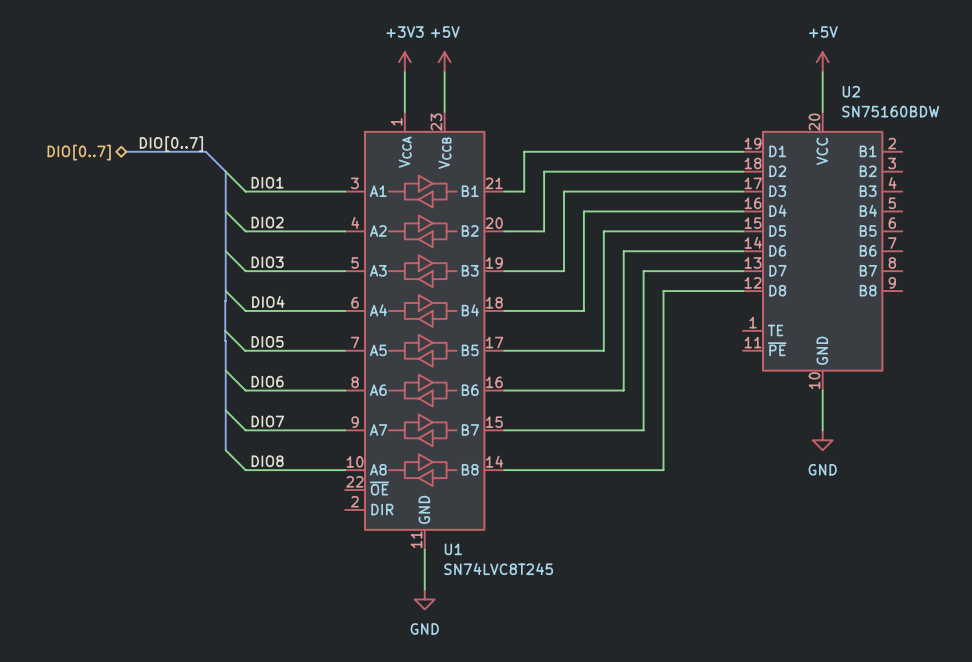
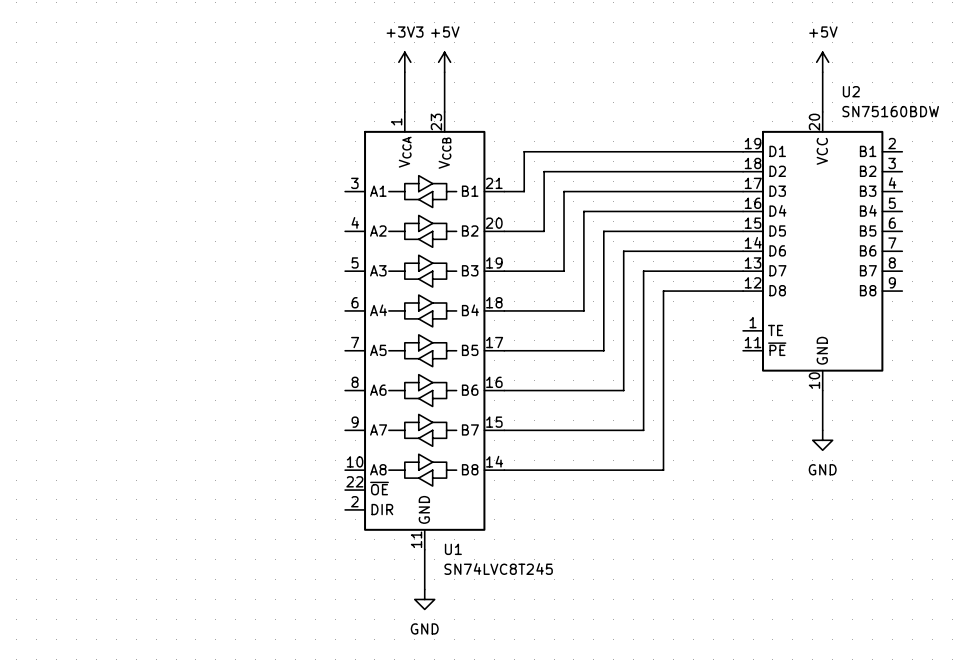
label: DIO[0..7] (171, 144) -> none
bus: (126, 151) (205, 151) (225, 171) (225, 450) -> none
hierarchical label: DIO[0..7] (79, 152) -> none
wire: (225, 171) (245, 191) (345, 191) -> none
label: DIO1 (267, 182) -> none
wire: (225, 211) (245, 231) (345, 231) -> none
label: DIO2 (267, 222) -> none
wire: (225, 251) (245, 271) (345, 271) -> none
label: DIO3 (267, 262) -> none
wire: (225, 291) (245, 310) (345, 310) -> none
label: DIO4 (268, 301) -> none
wire: (225, 330) (245, 350) (344, 350) -> none
label: DIO5 (267, 341) -> none
wire: (225, 370) (245, 390) (345, 390) -> none
label: DIO6 (267, 381) -> none
wire: (225, 410) (245, 430) (345, 430) -> none
label: DIO7 (267, 421) -> none
wire: (225, 450) (245, 470) (345, 470) -> none
label: DIO8 (267, 461) -> none

